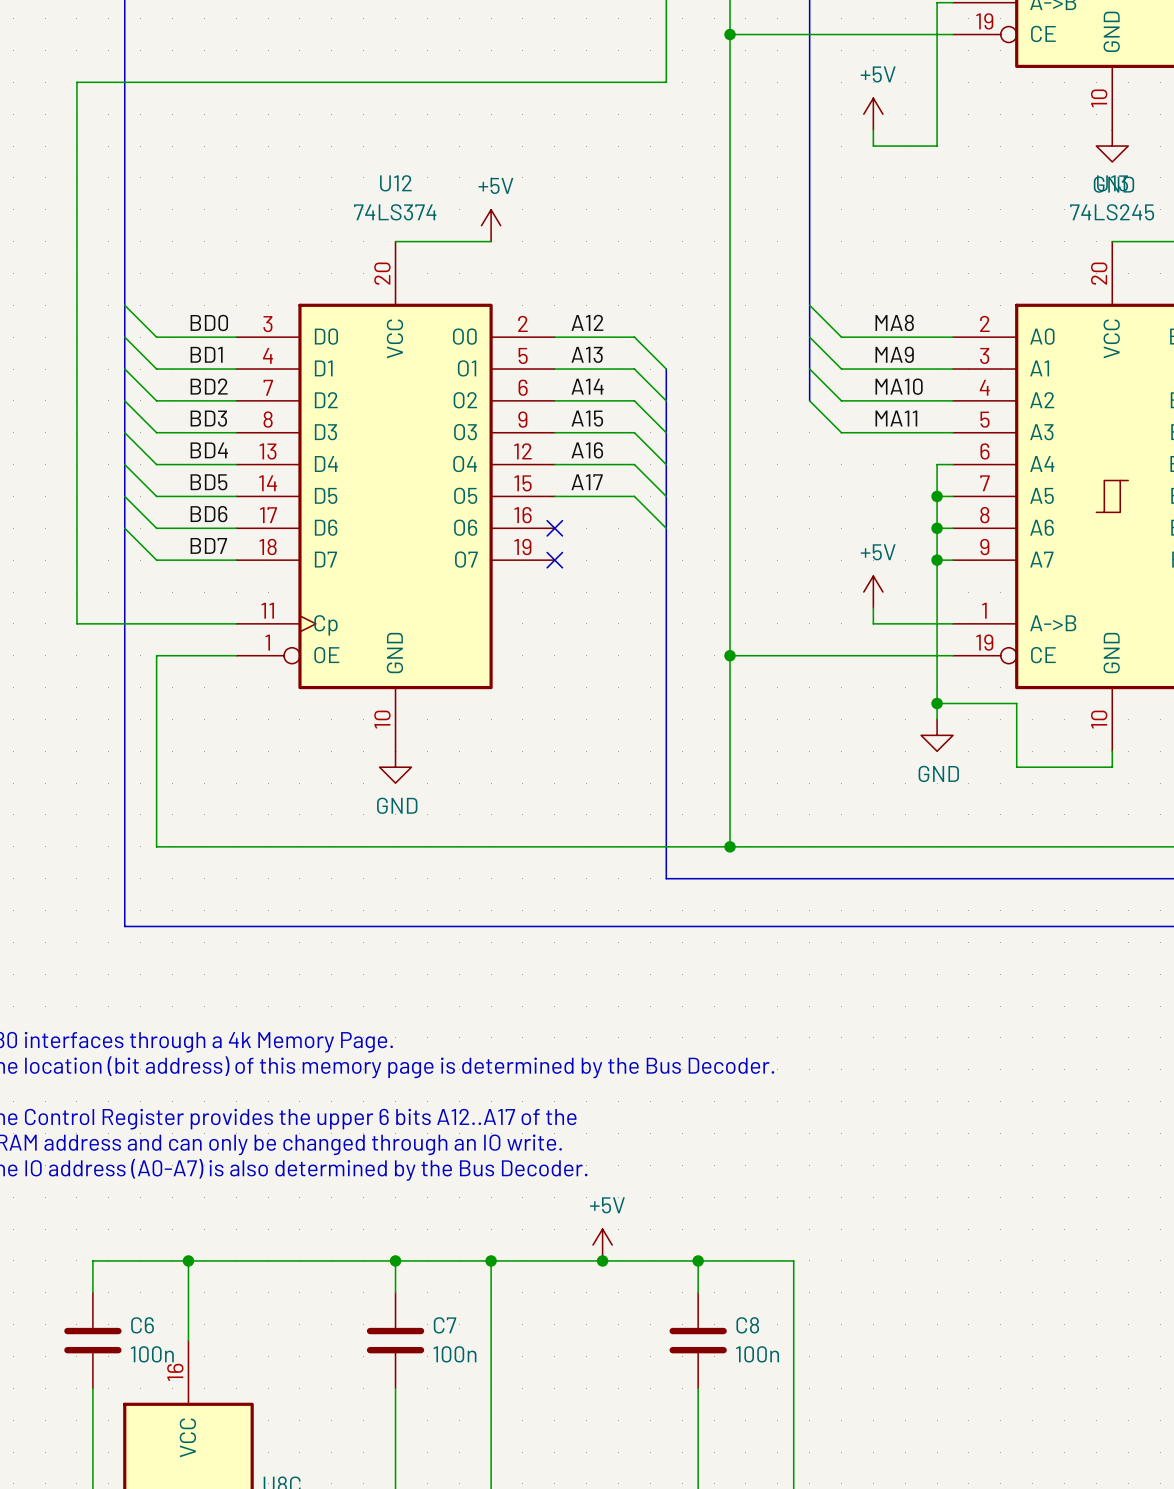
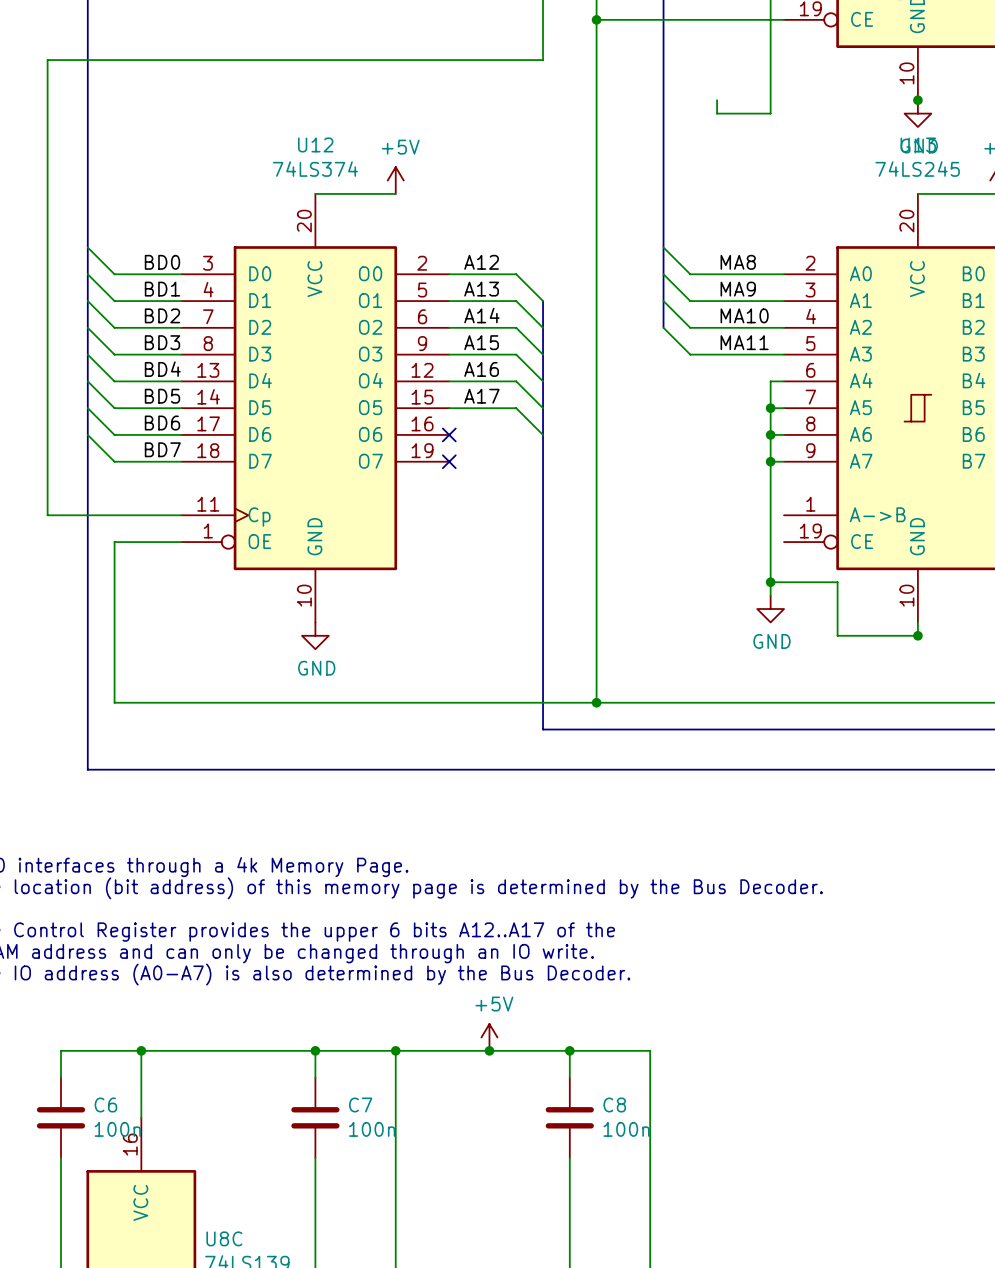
power symbol: +5V (873, 114) -> none
junction: none -> (917, 100)
power symbol: +5V (873, 592) -> none
wire: (873, 607) (873, 623) (953, 623) -> none
wire: (730, 655) (953, 655) -> none
junction: (730, 655) -> none
junction: none -> (917, 635)

